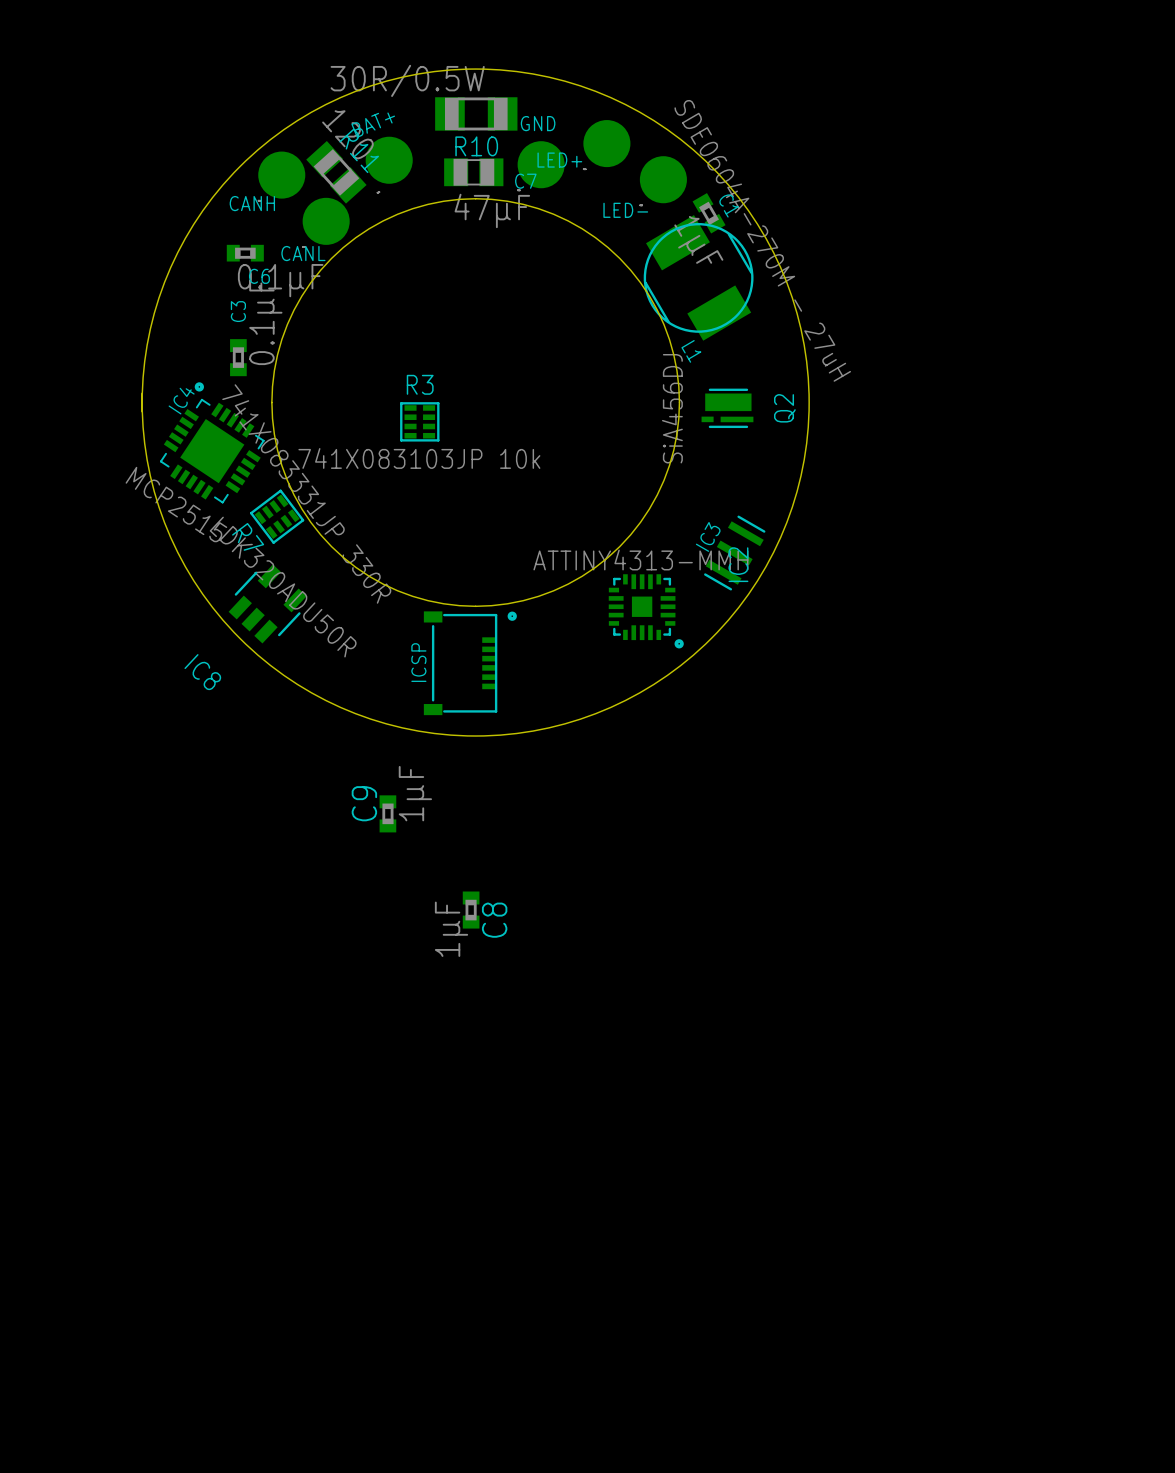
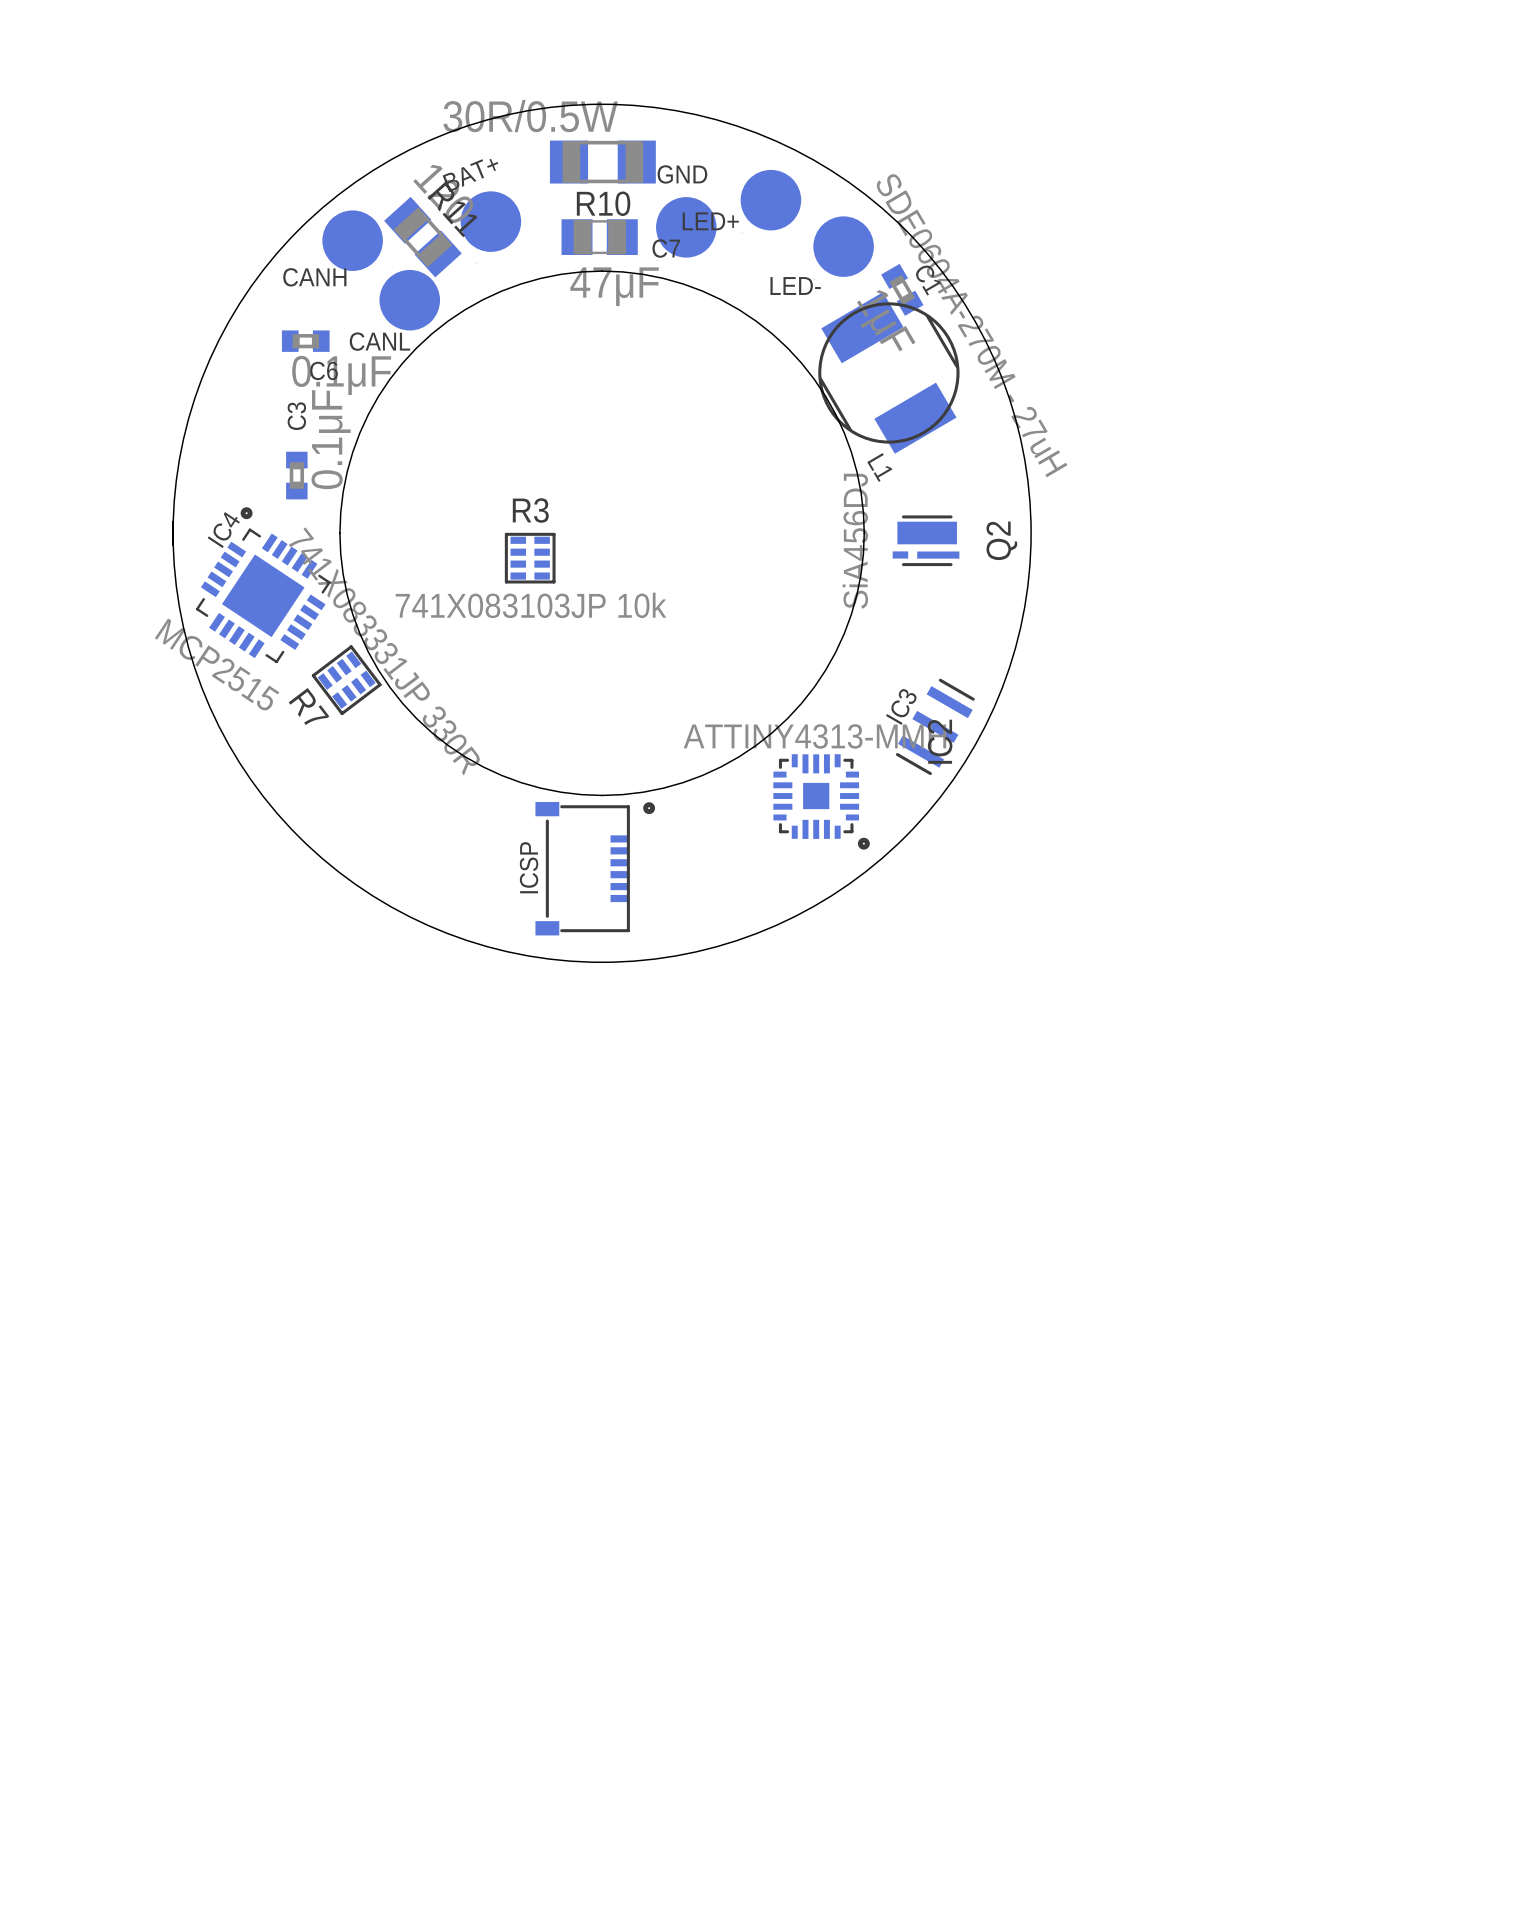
IC8: LDK320ADU50R (267, 603) -> none
C9: 1μF (387, 813) -> none
C8: 1μF (471, 910) -> none

